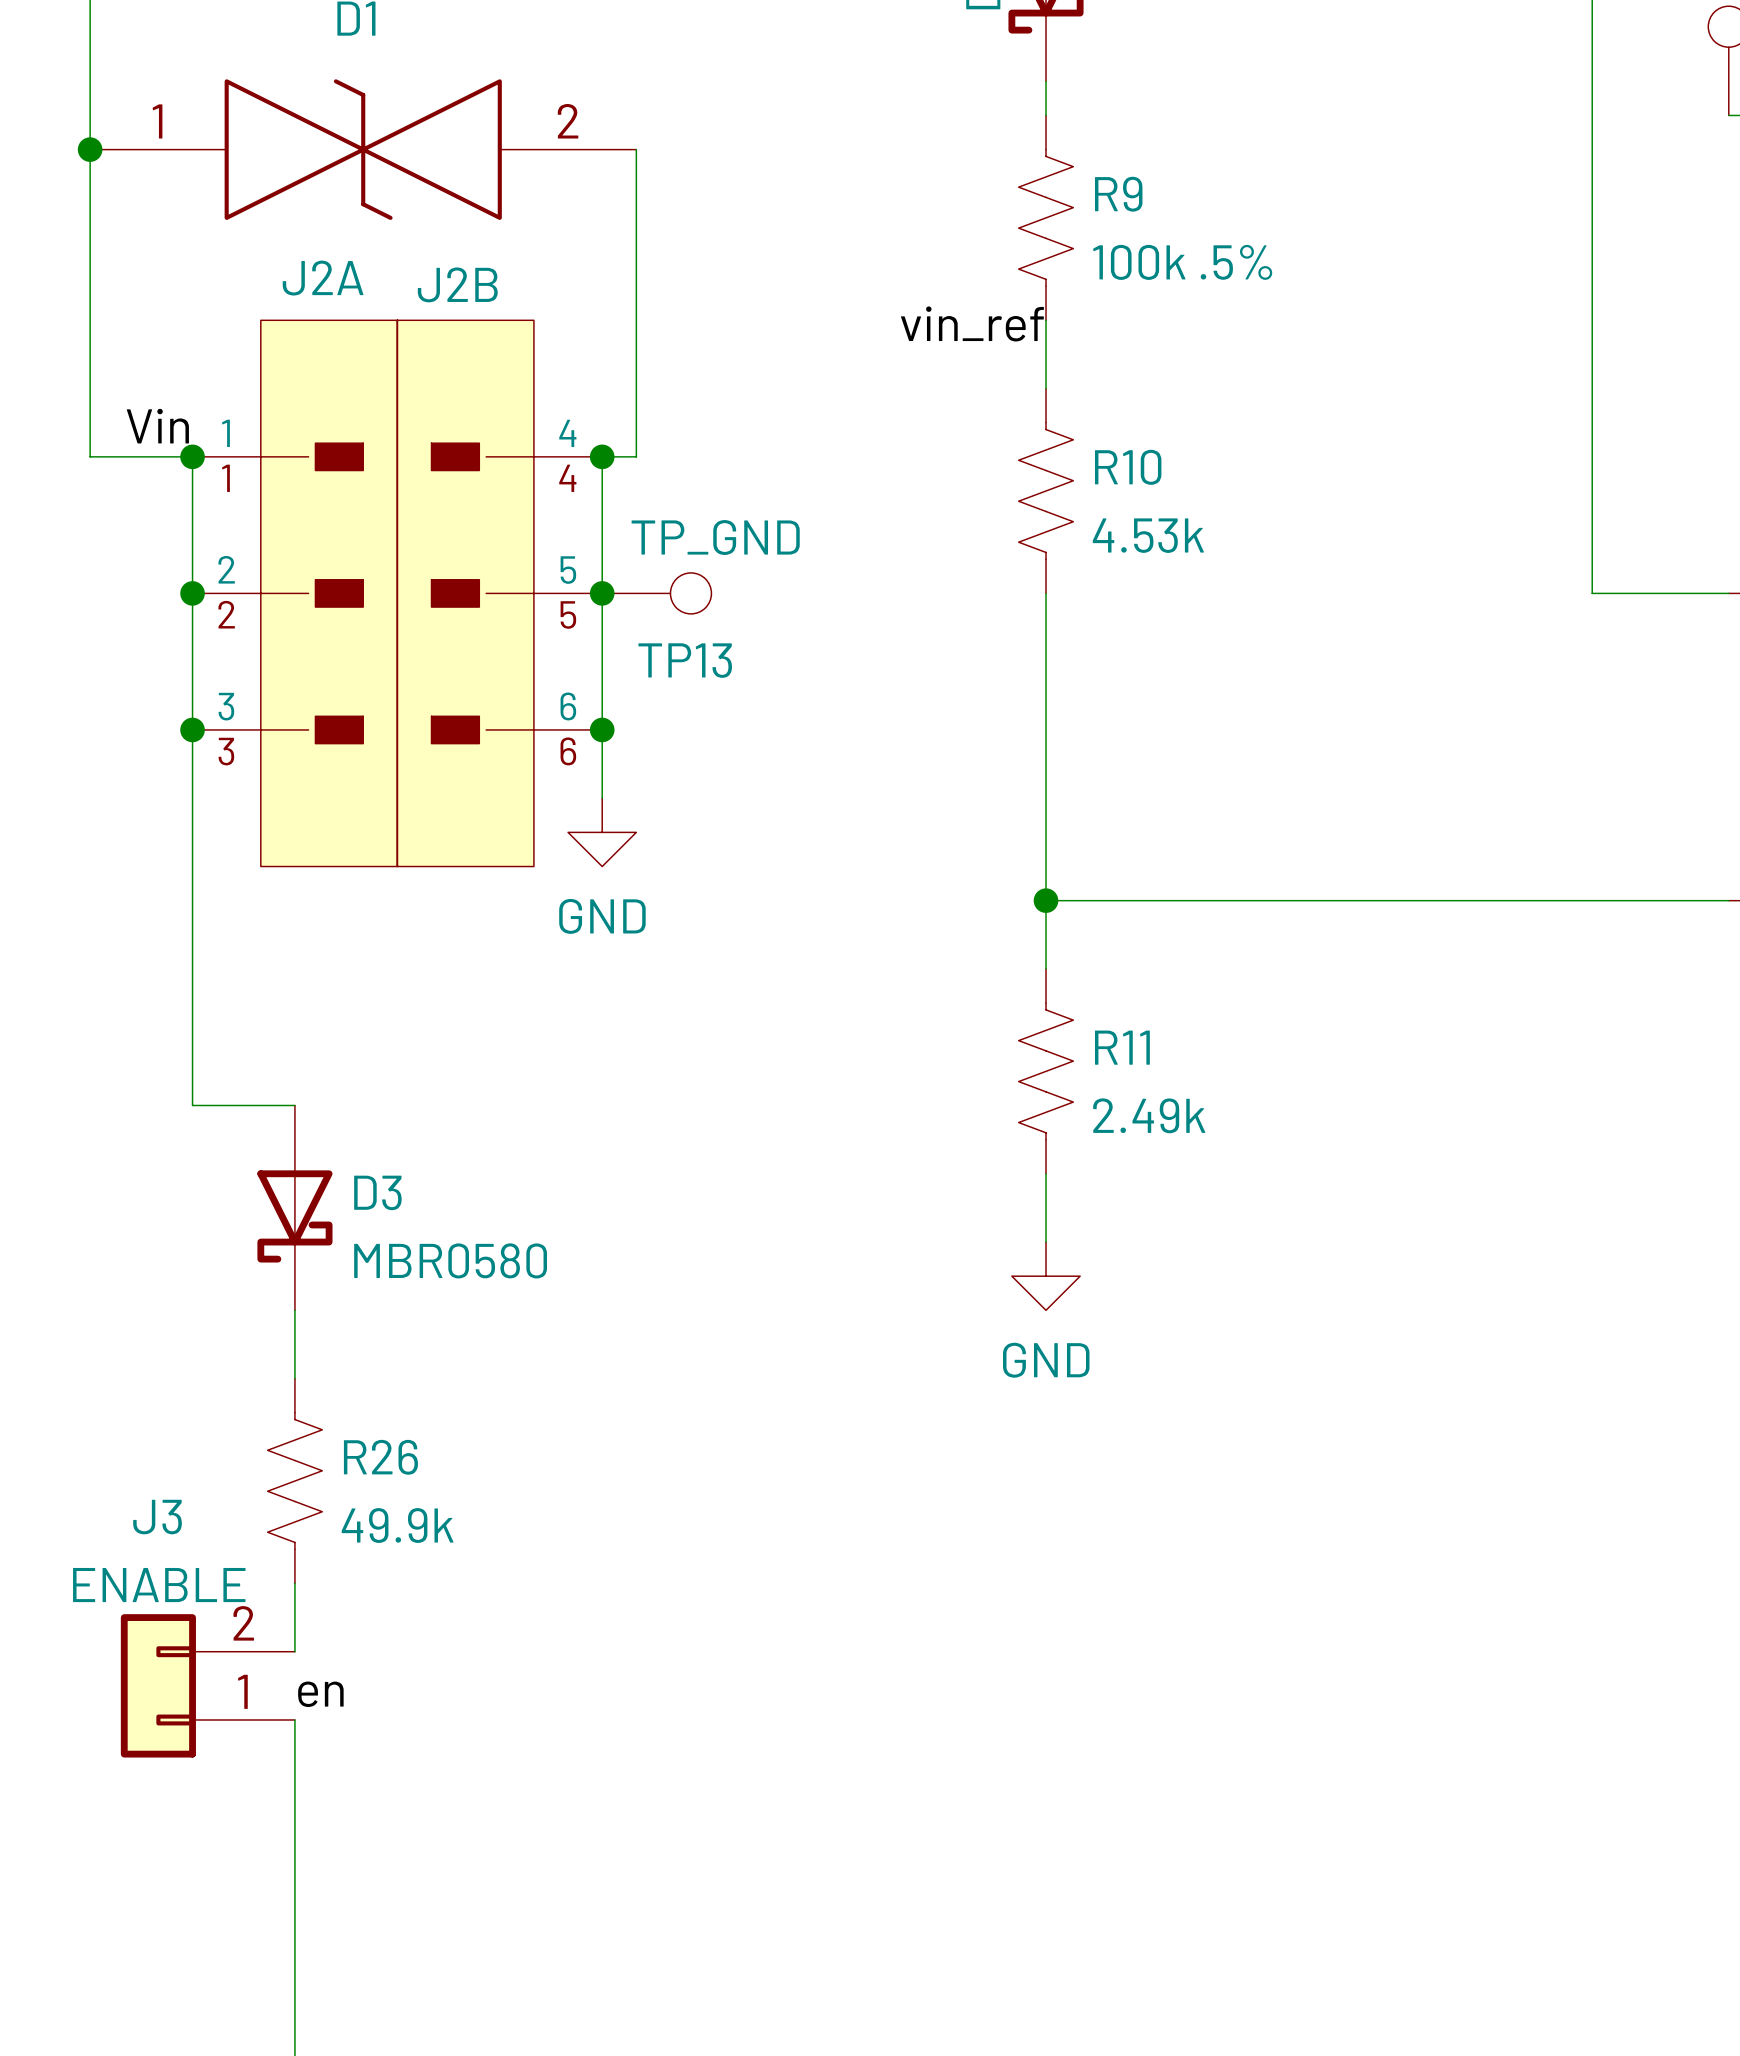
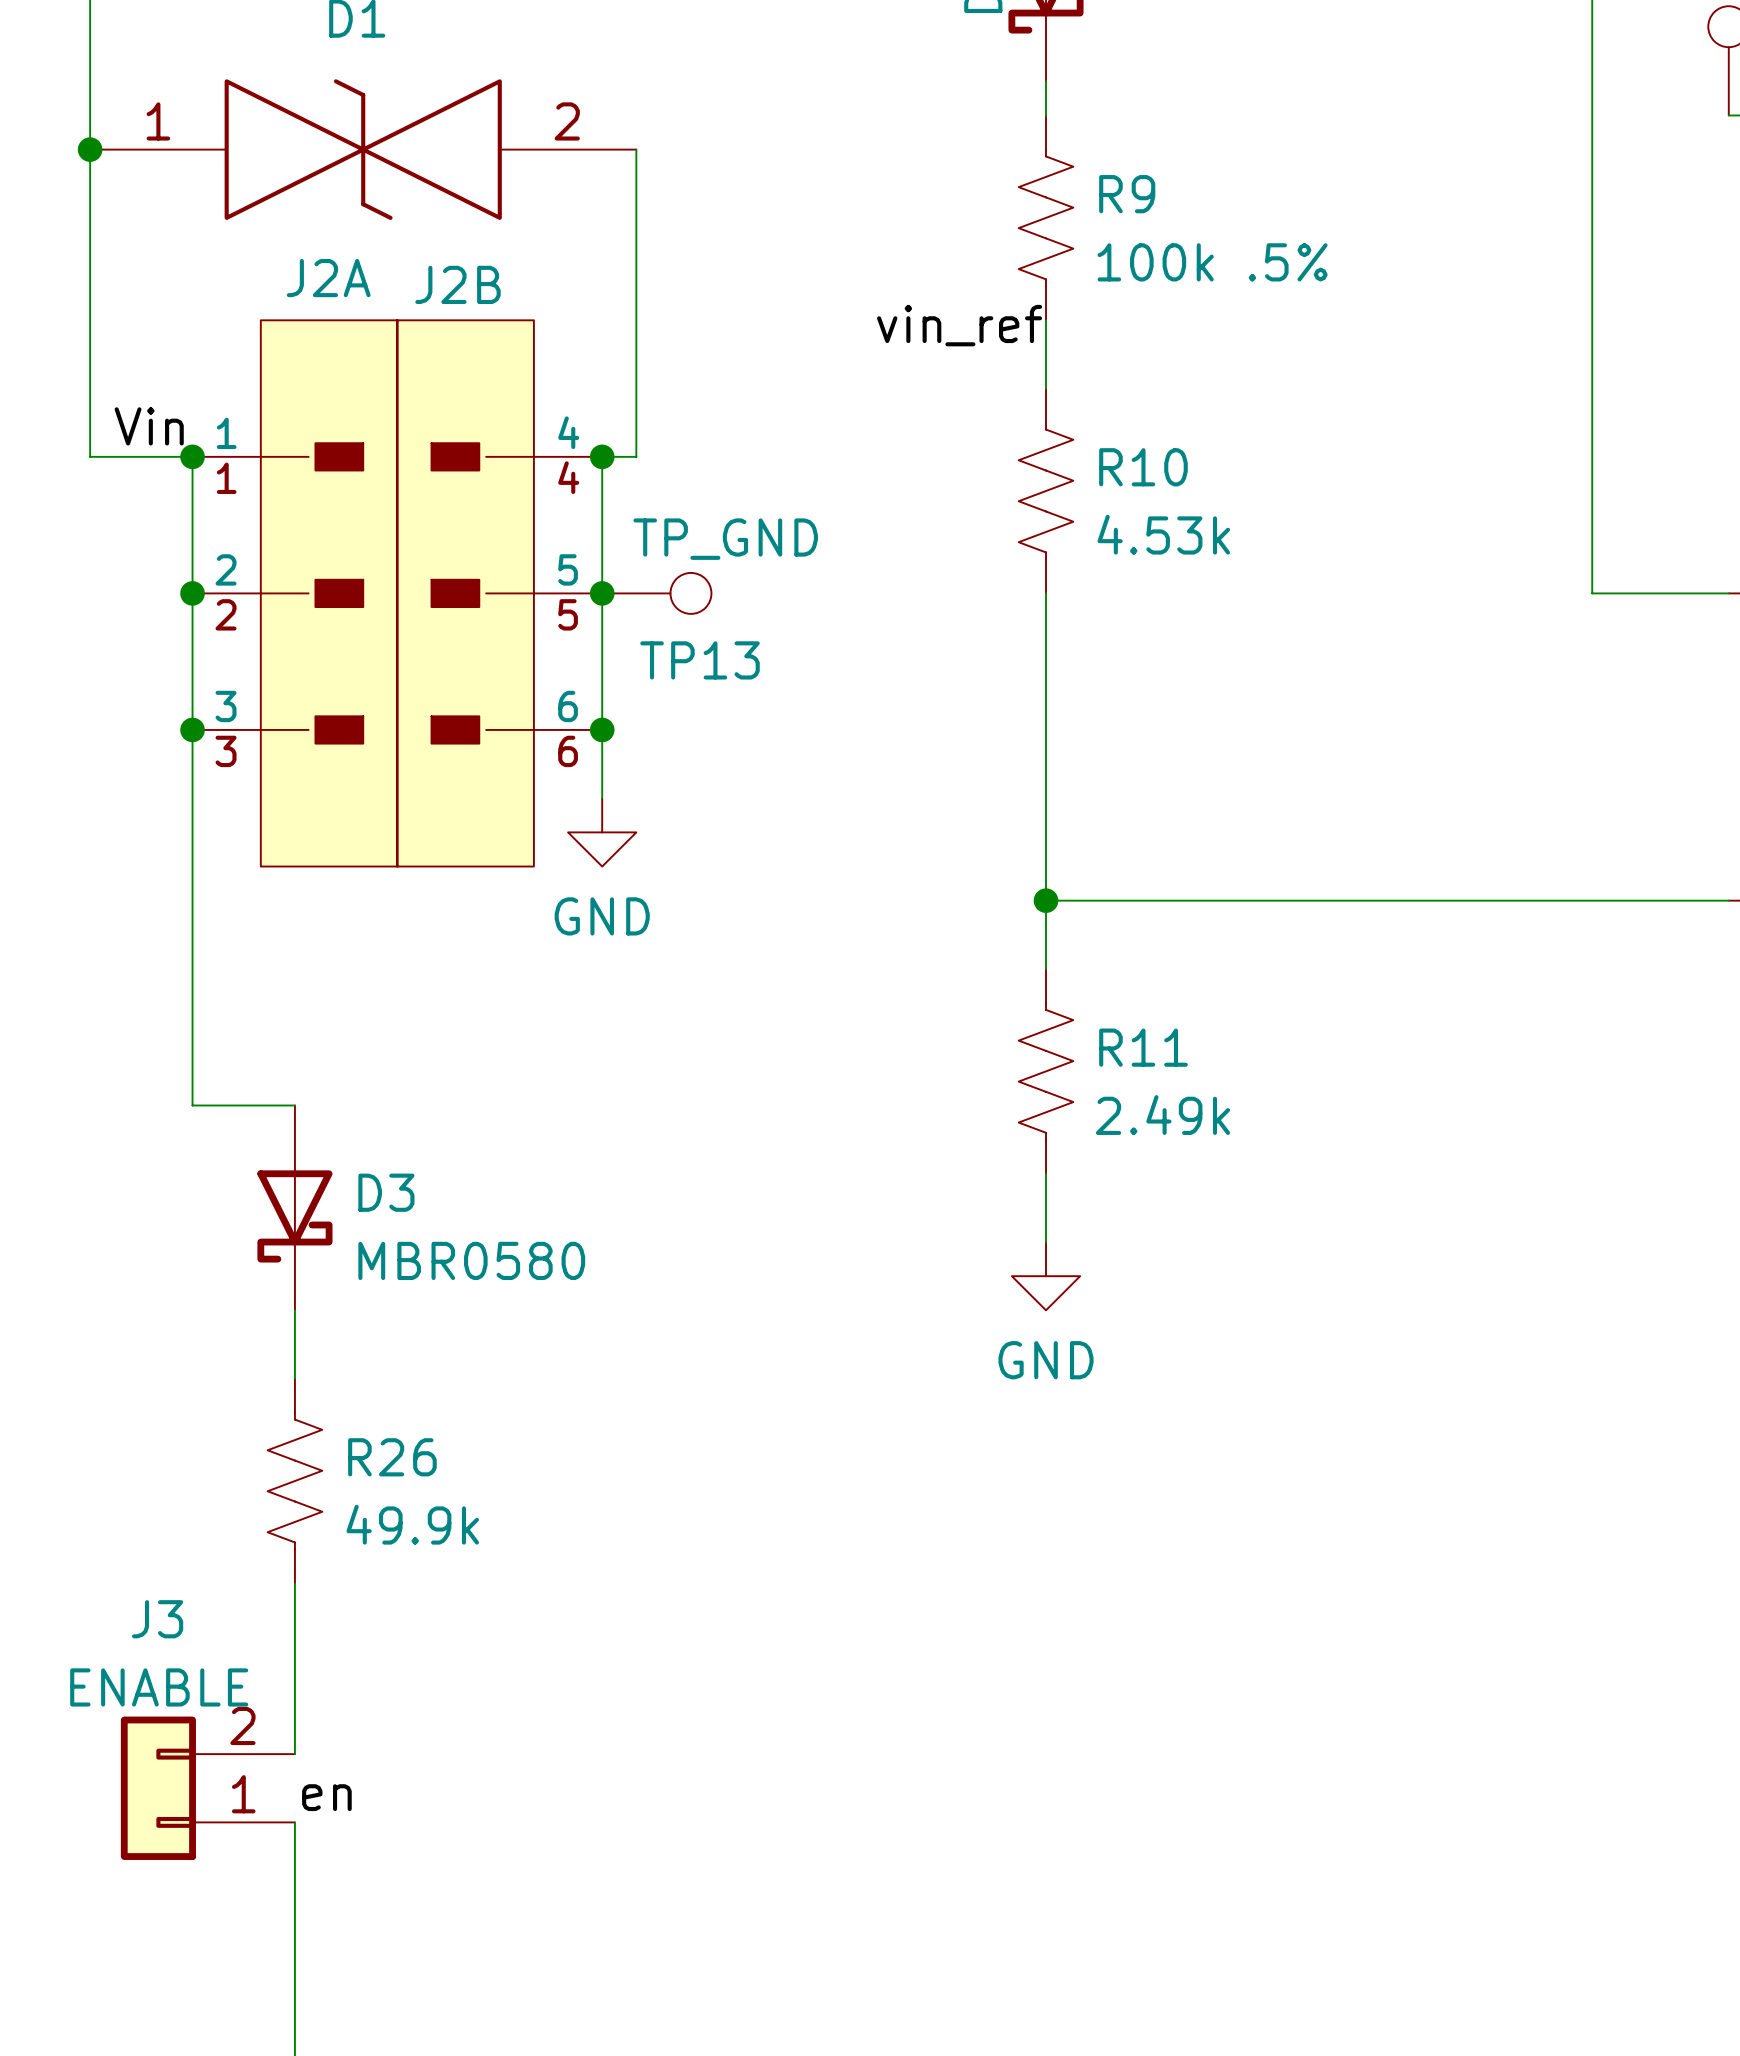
J3 position: (207, 1685) -> (207, 1788)
label position: en (320, 1694) -> en (326, 1797)
wire: (294, 1754) (294, 1822) -> (294, 1651) (294, 1719)

